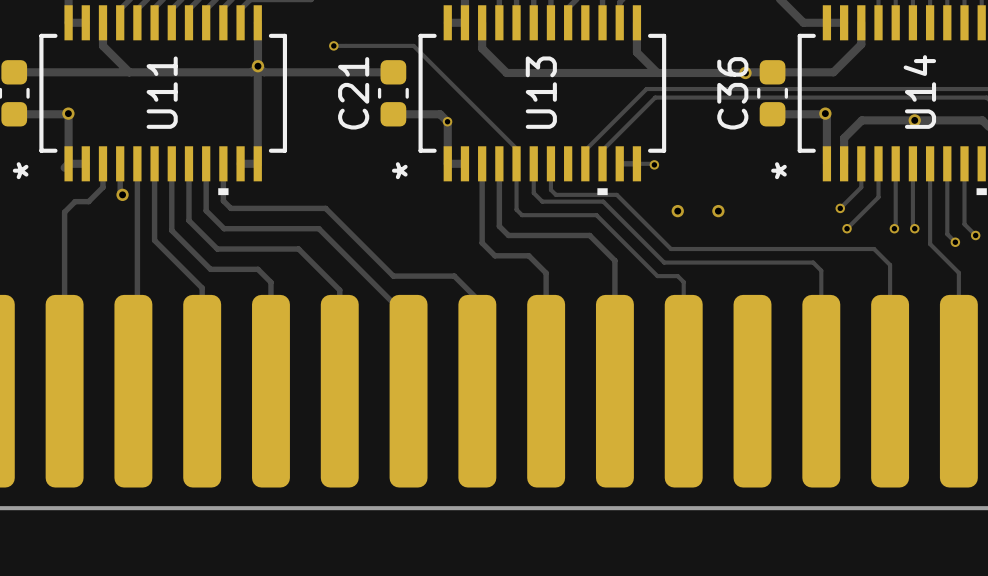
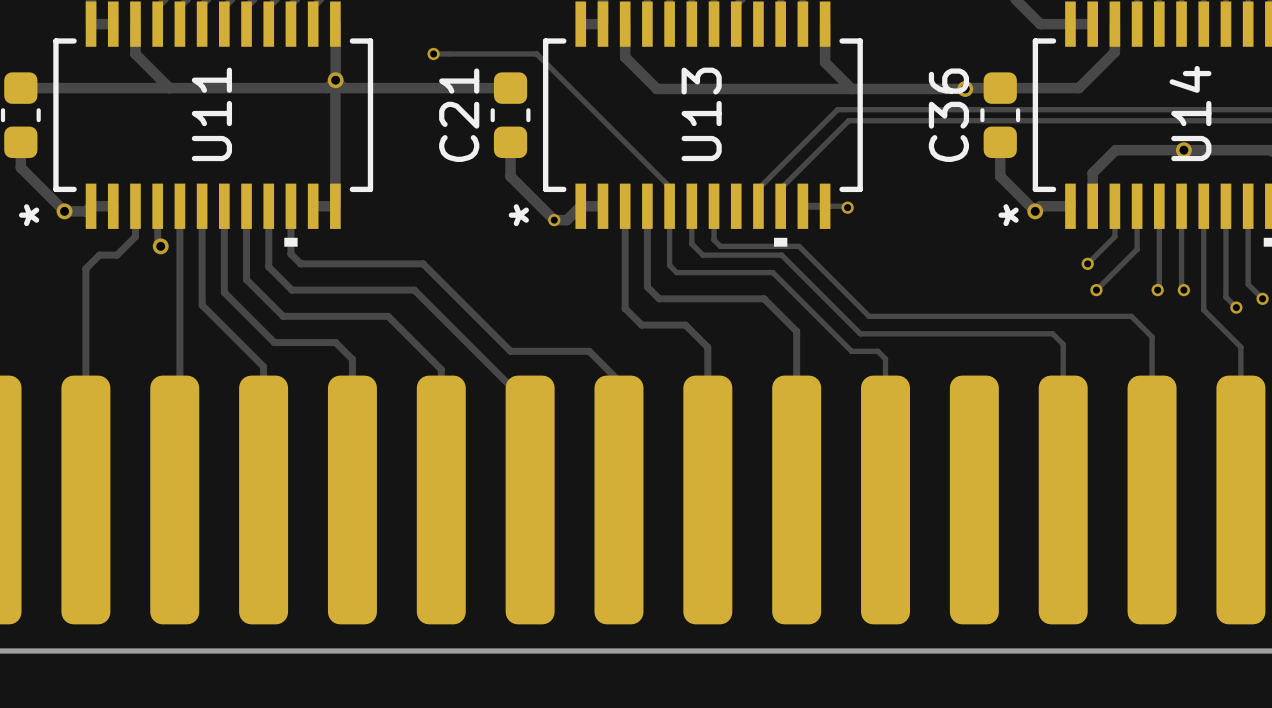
track: (68, 113) (14, 114) -> (85, 211) (64, 211) (20, 167) (20, 142)
track: (68, 113) (68, 163) -> none
via position: (68, 113) -> (64, 211)
via: (825, 113) -> none
track: (393, 114) (440, 114) (447, 121) (447, 163) -> (510, 142) (510, 176) (554, 220) (566, 220) (580, 206)
track: (772, 114) (825, 113) (826, 115) (826, 163) -> (1000, 142) (1000, 176) (1035, 211) (1040, 206) (1070, 206)
via position: (447, 121) -> (554, 220)
via: none -> (1035, 211)
via: (677, 211) -> none
via: (718, 211) -> none

